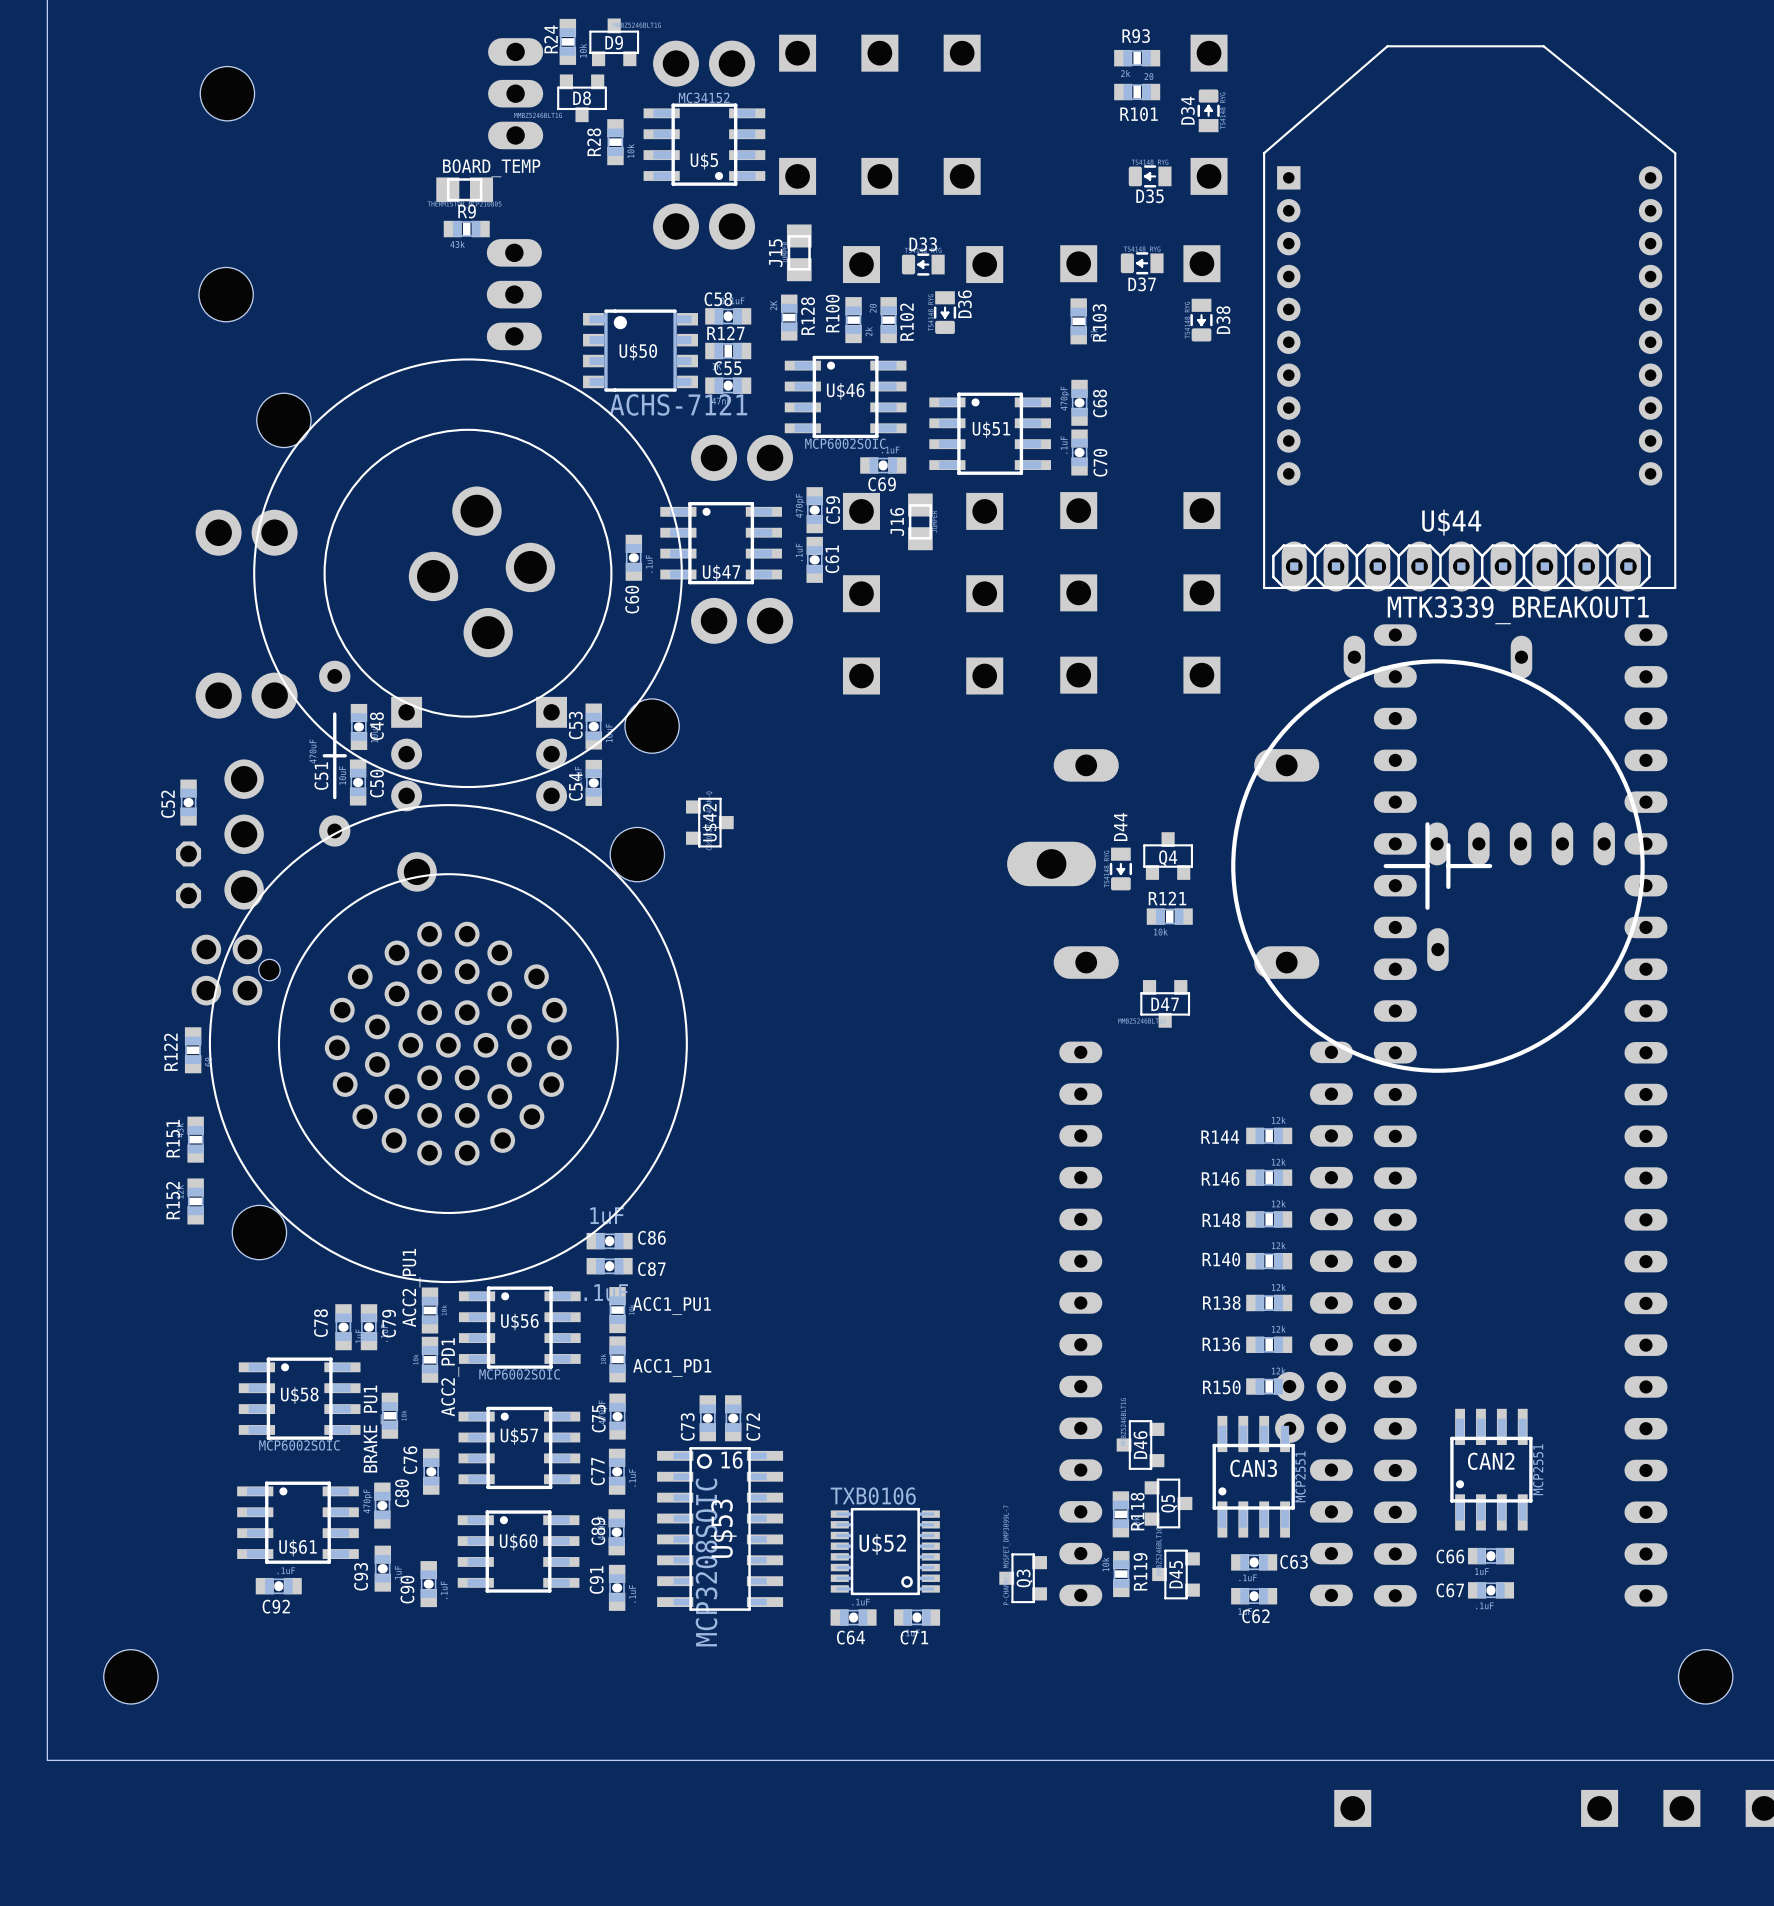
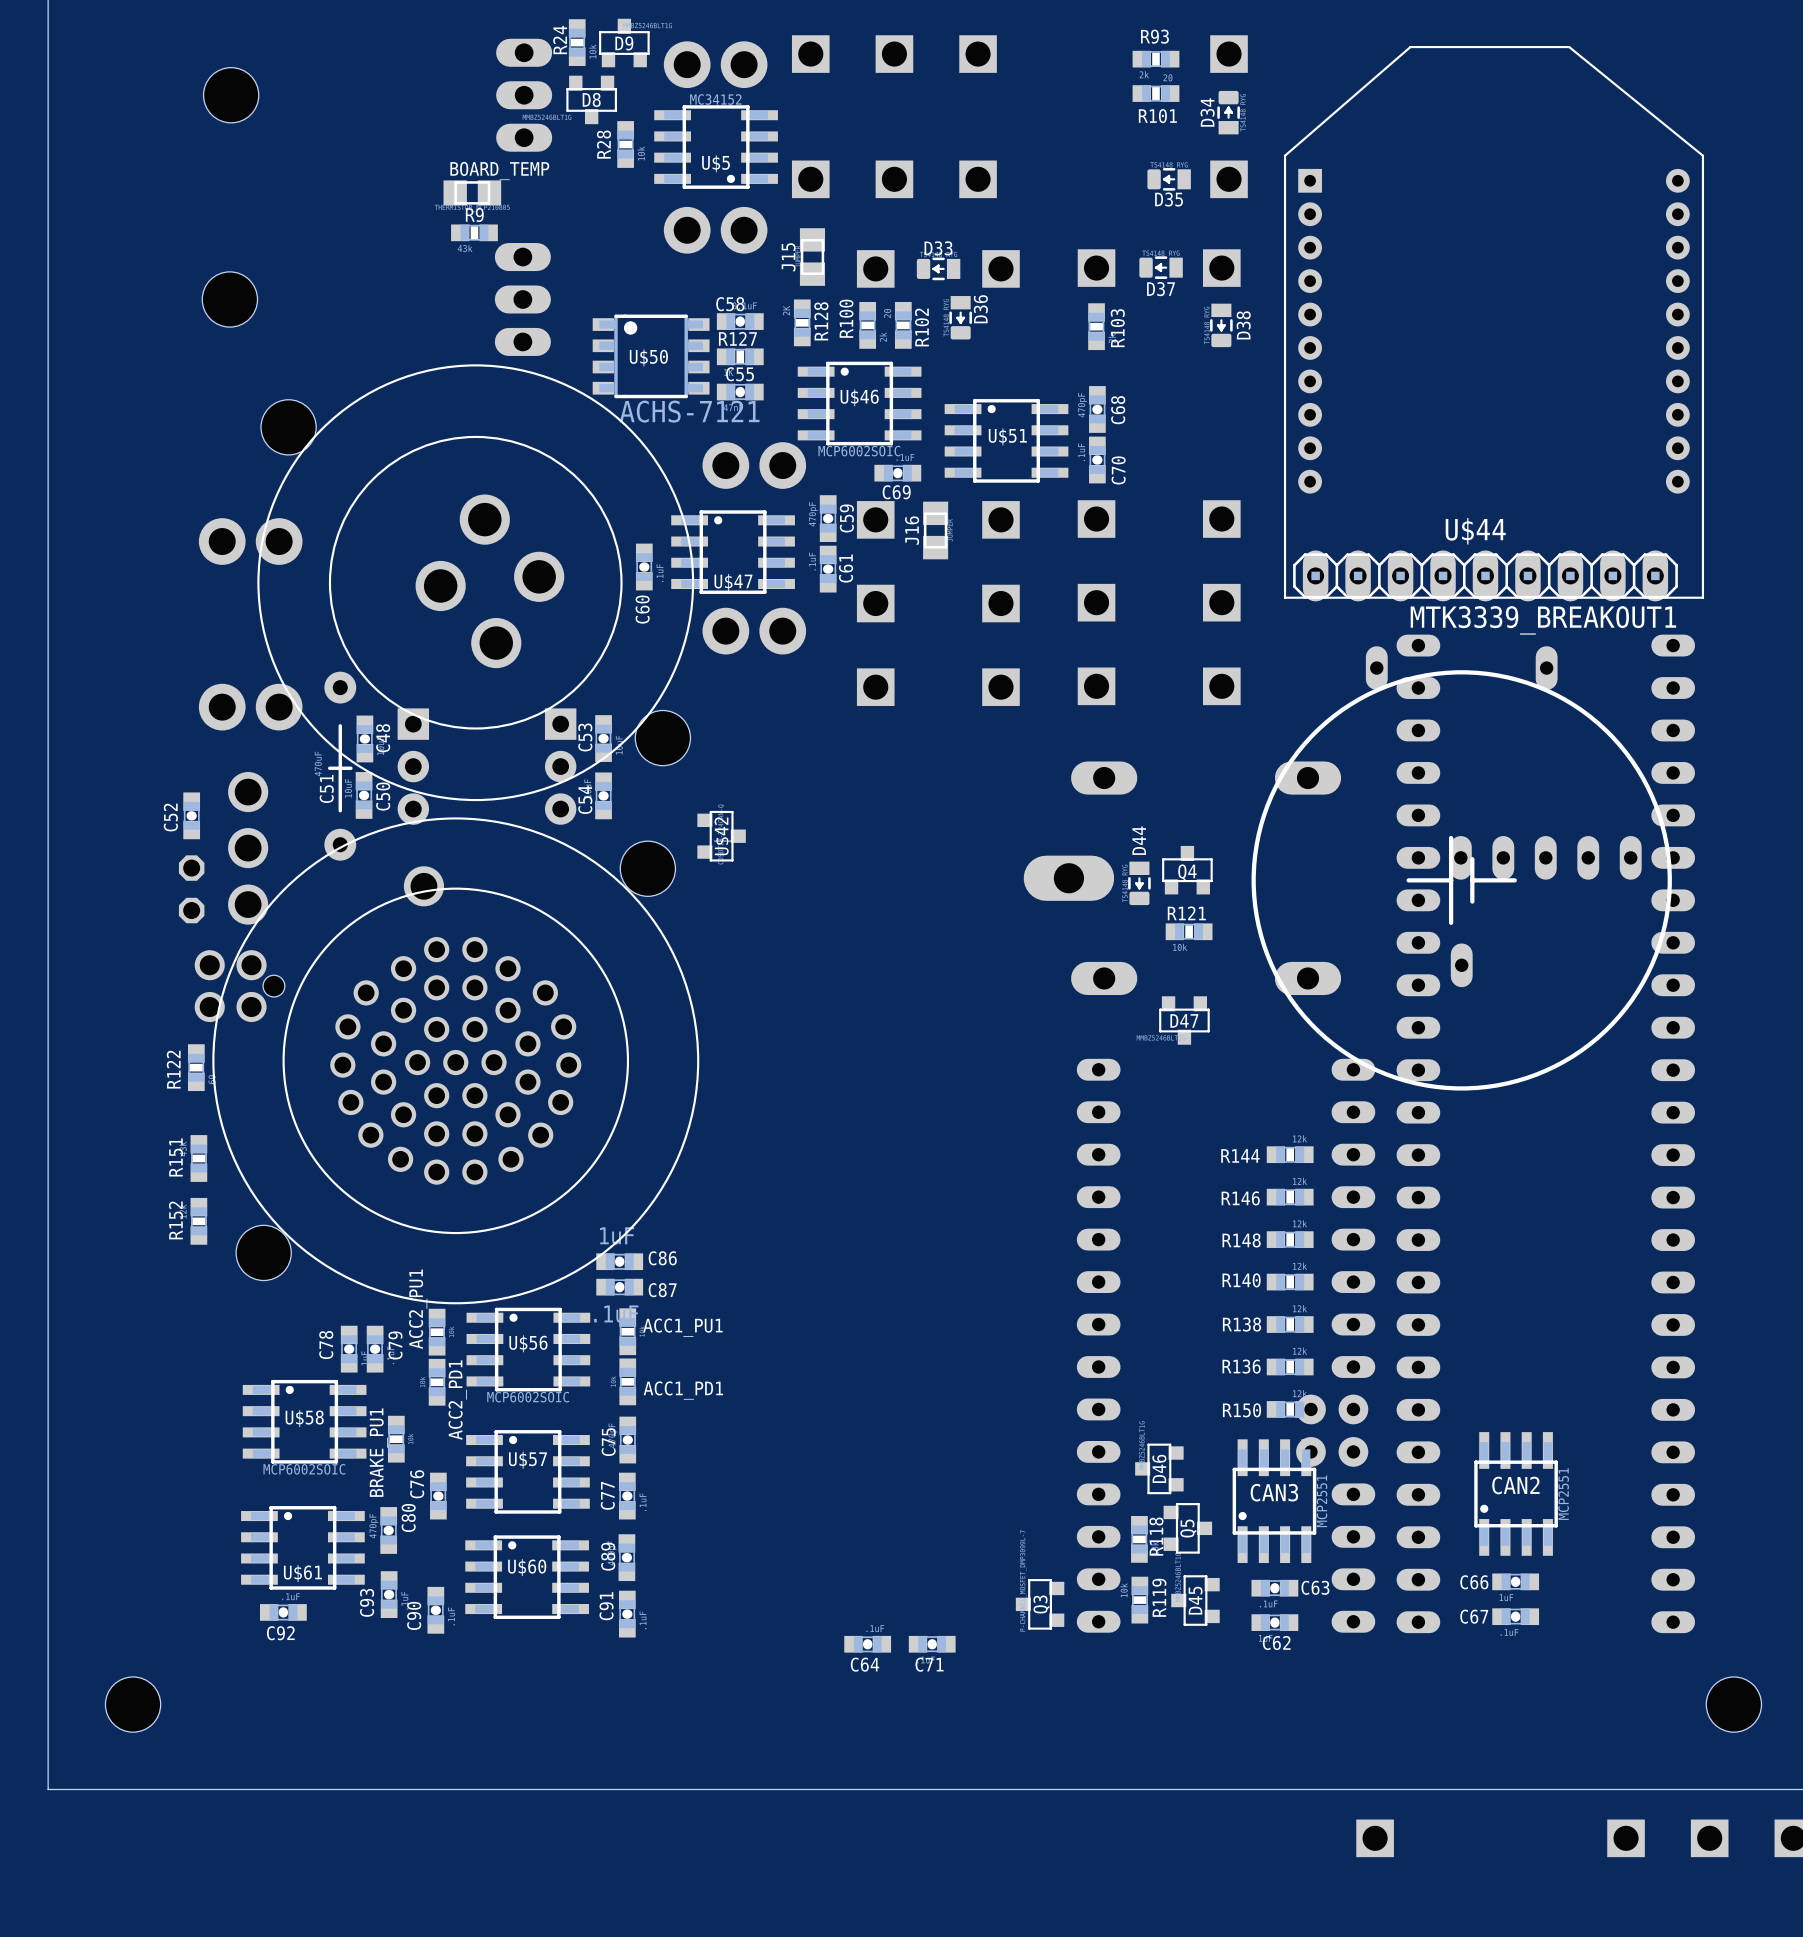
C73: (707, 1418) -> none
C72: (733, 1418) -> none
U$53: MCP3208SOIC (720, 1528) -> none
U$52: TXB0106 (885, 1551) -> none

